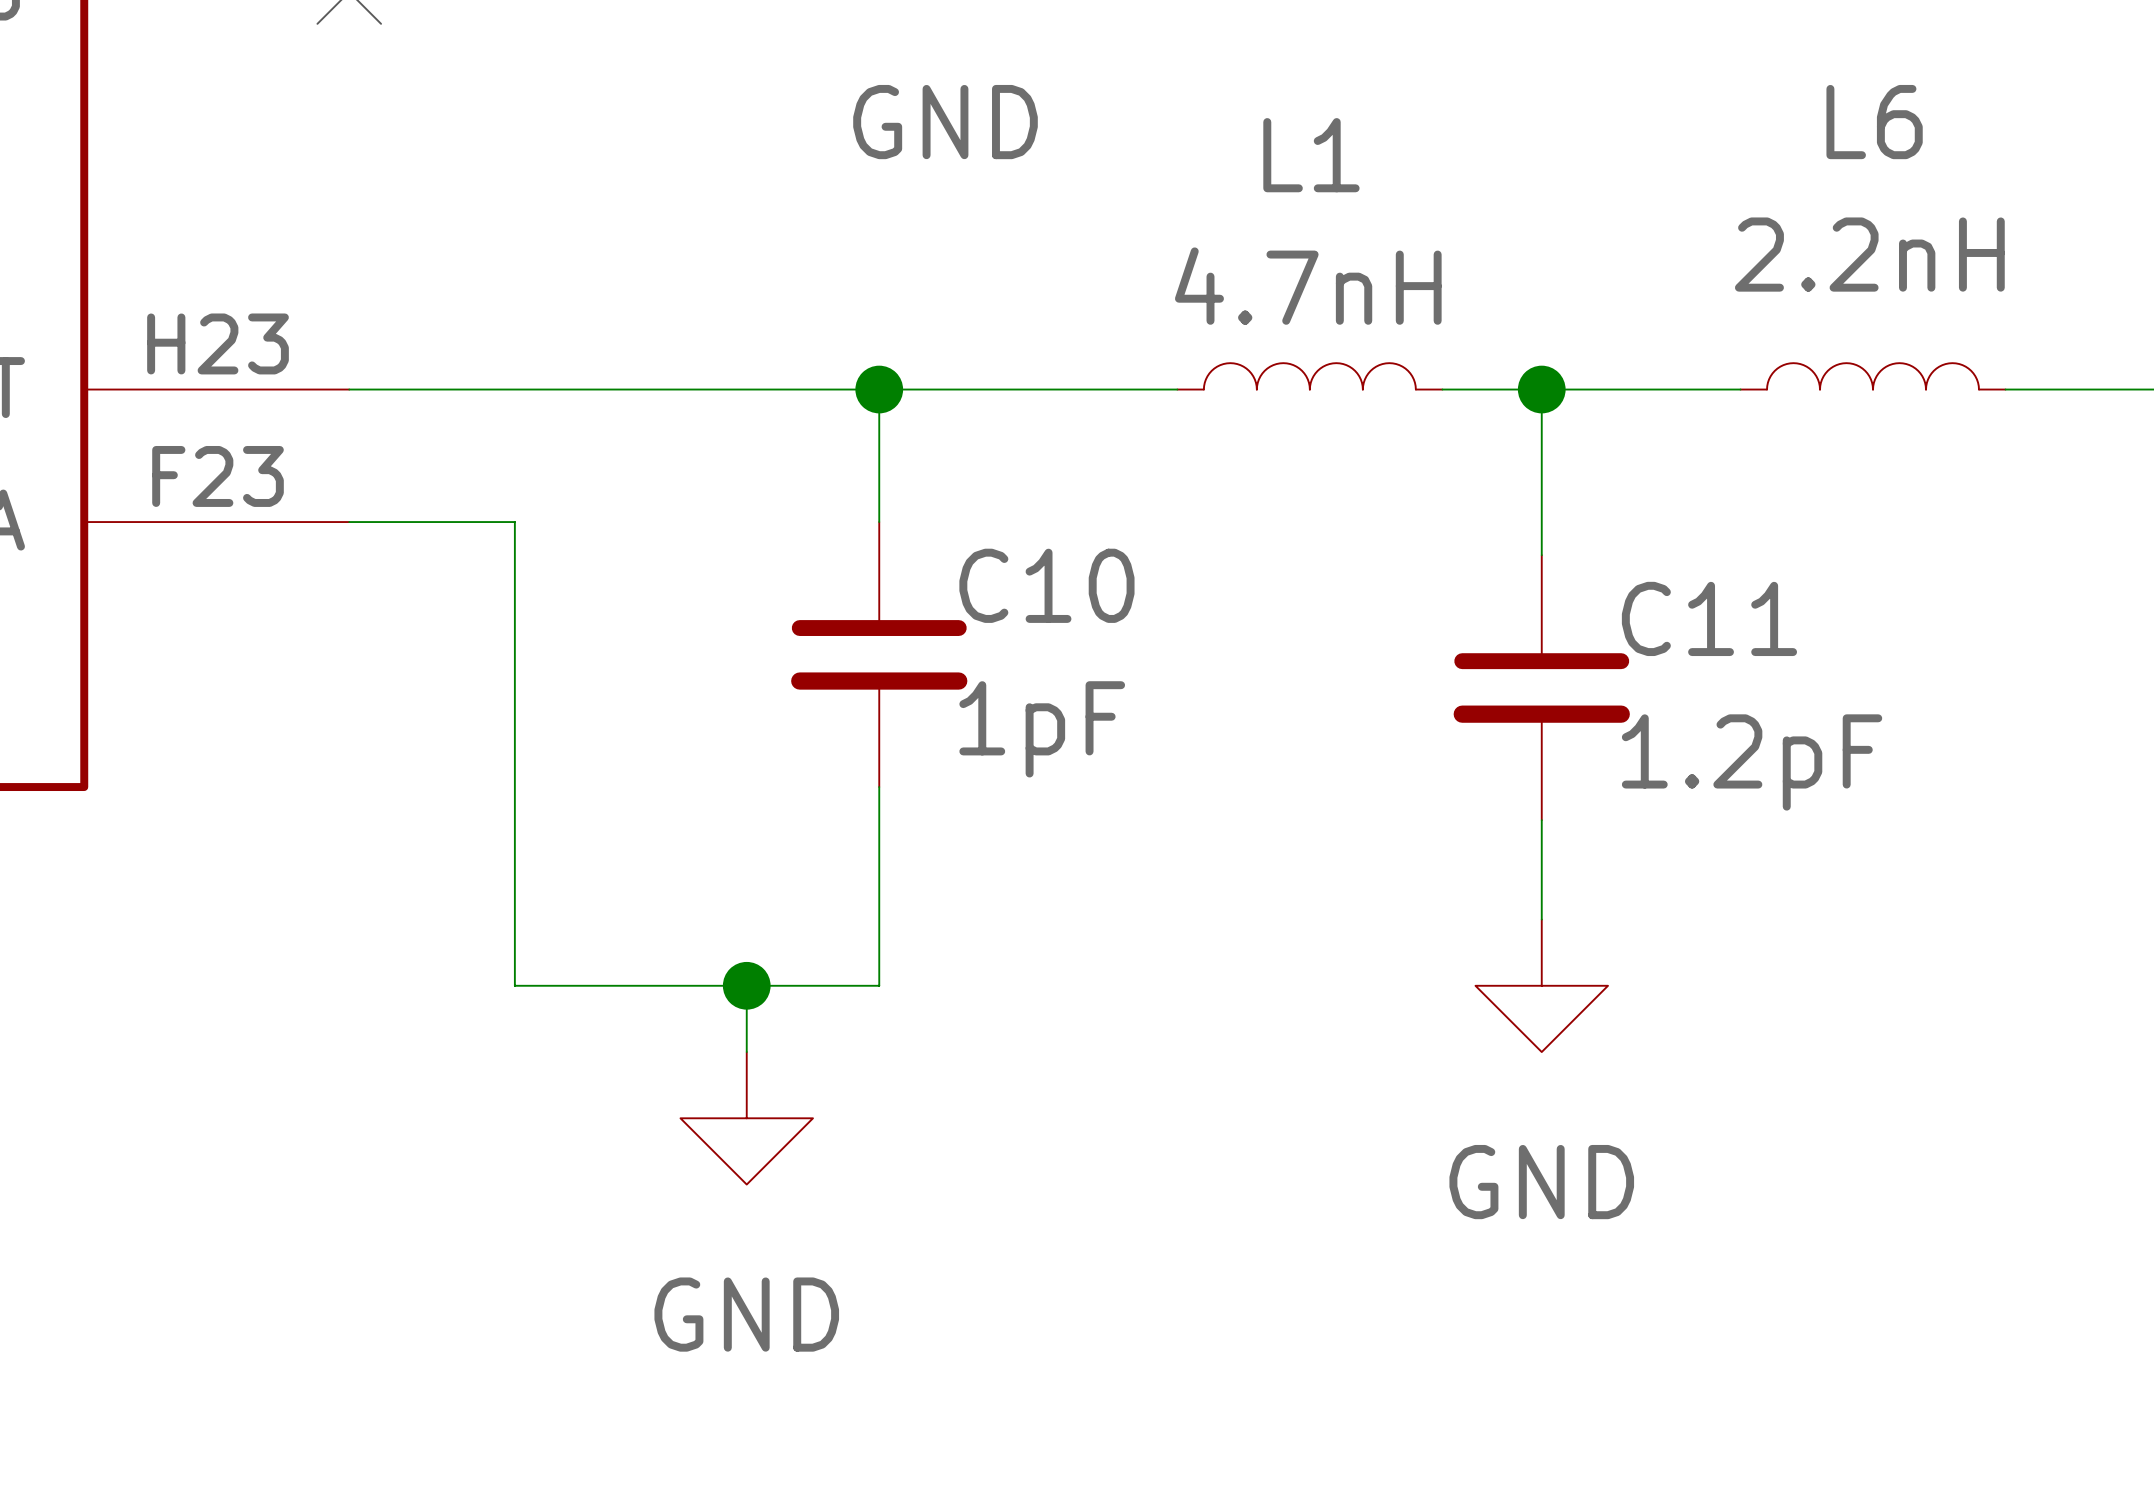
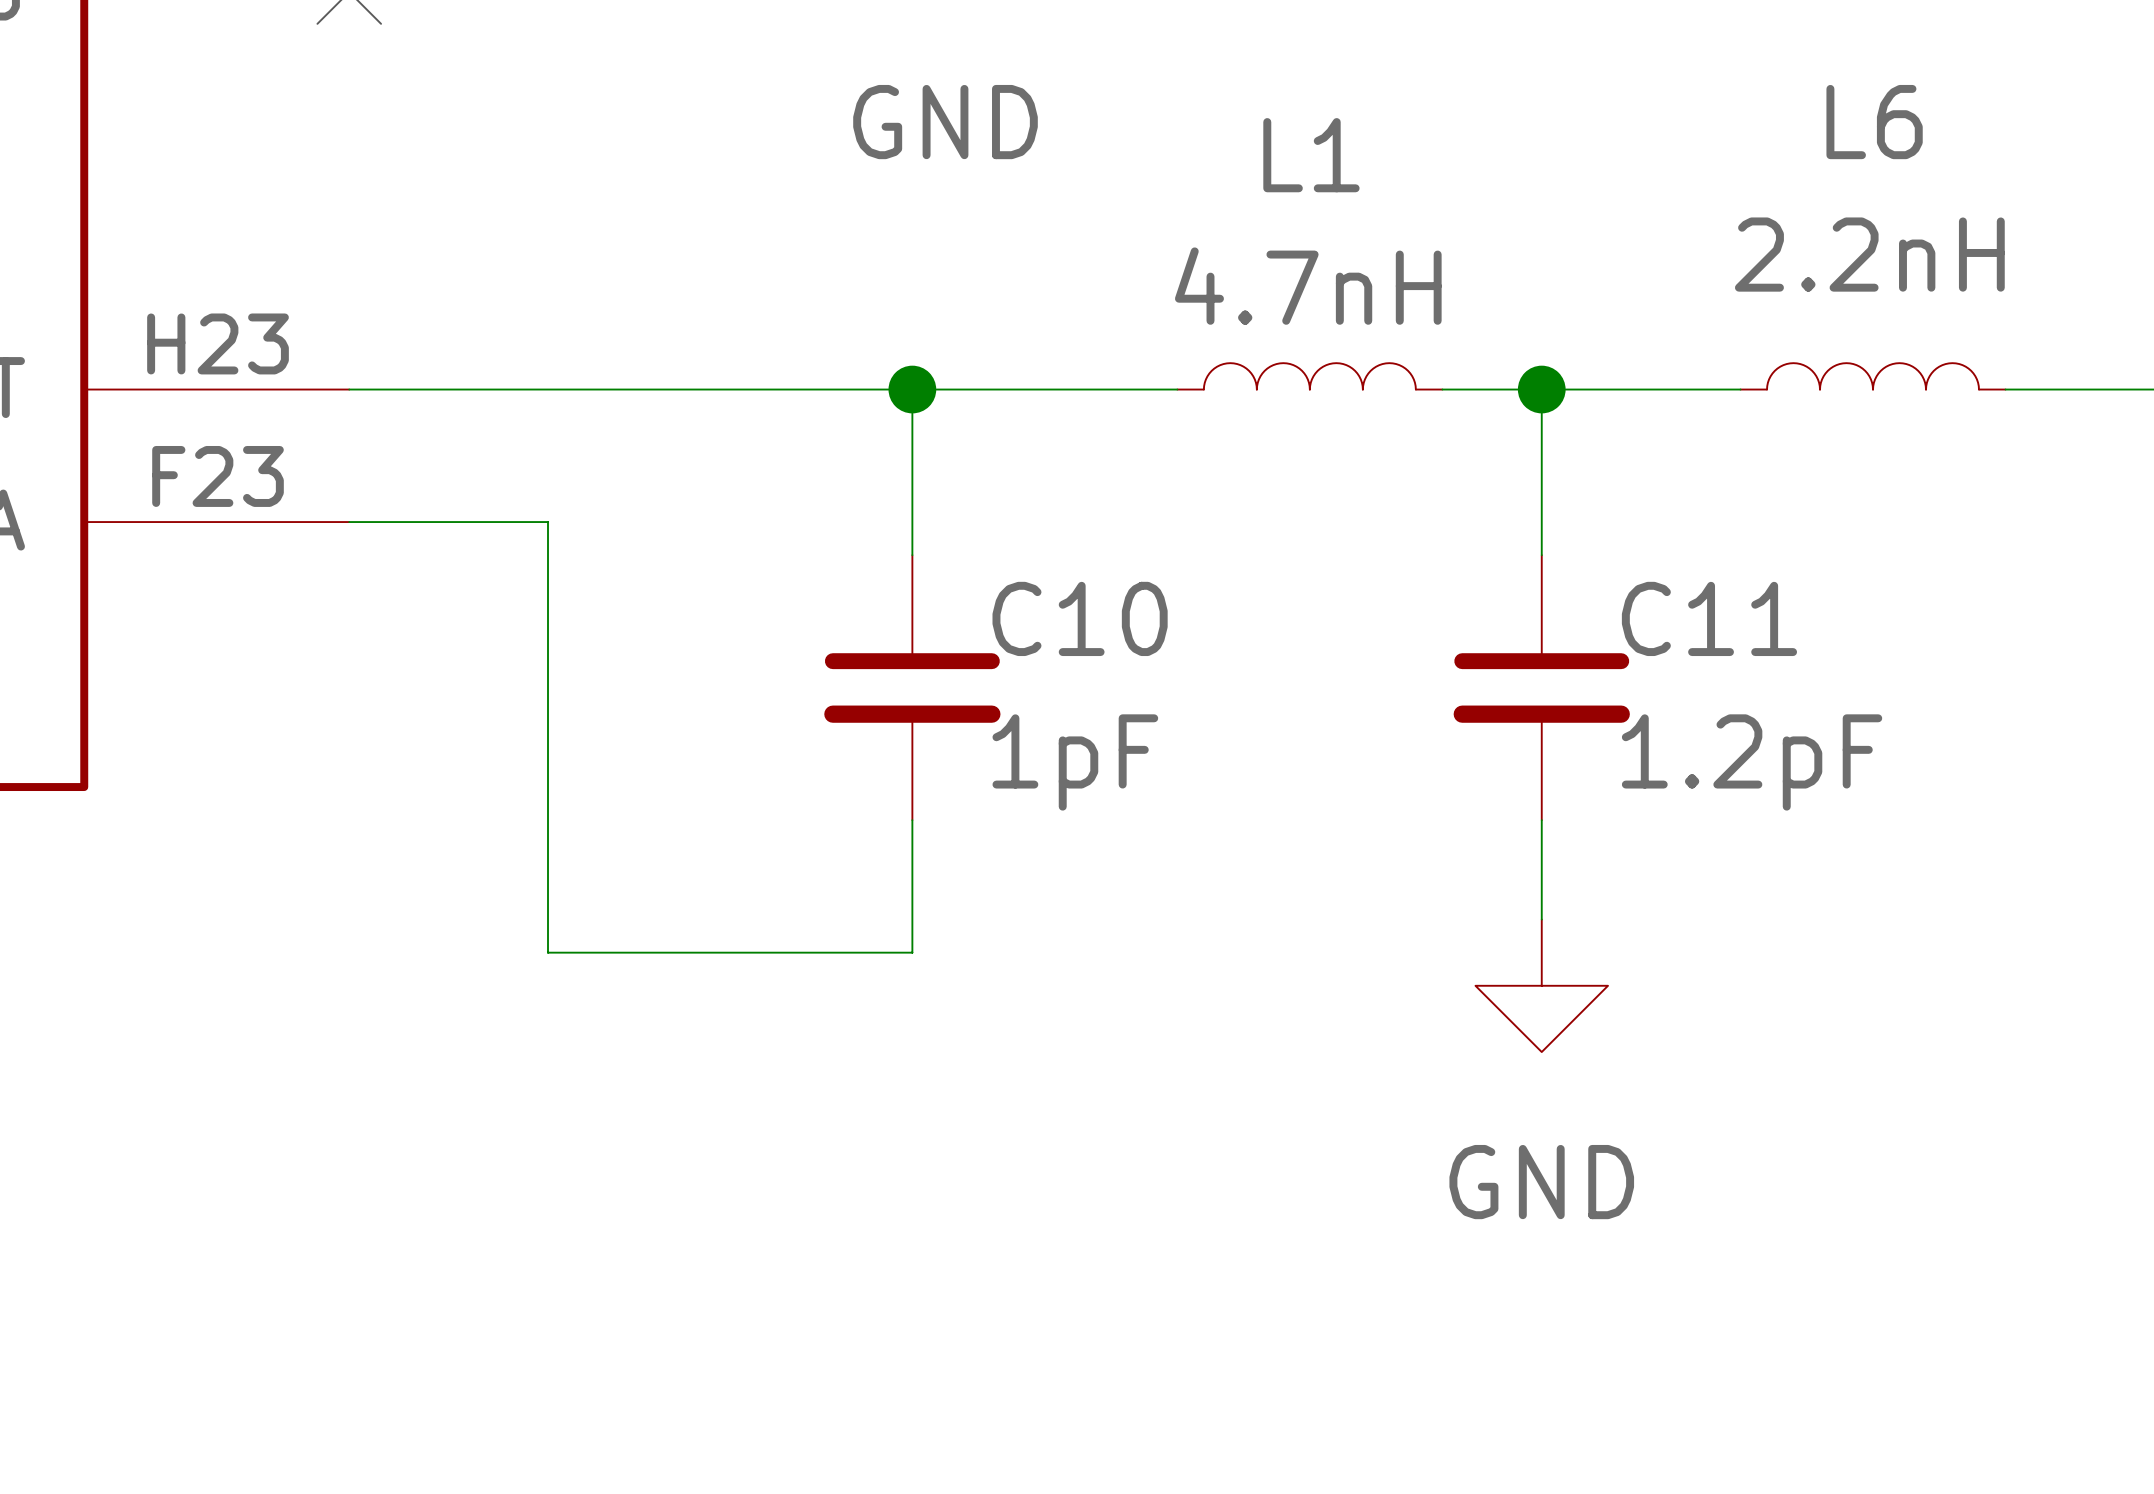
wire: (879, 389) (879, 522) -> none
junction position: (879, 389) -> (912, 389)
wire: none -> (912, 389) (912, 555)
wire: (514, 522) (514, 985) (879, 985) (879, 787) -> (514, 522) (548, 522) (548, 952) (912, 952) (912, 820)
C10 position: (879, 654) -> (912, 687)
wire: (746, 985) (746, 1052) -> none
junction: (746, 985) -> none
power symbol: GND (746, 1118) -> none

